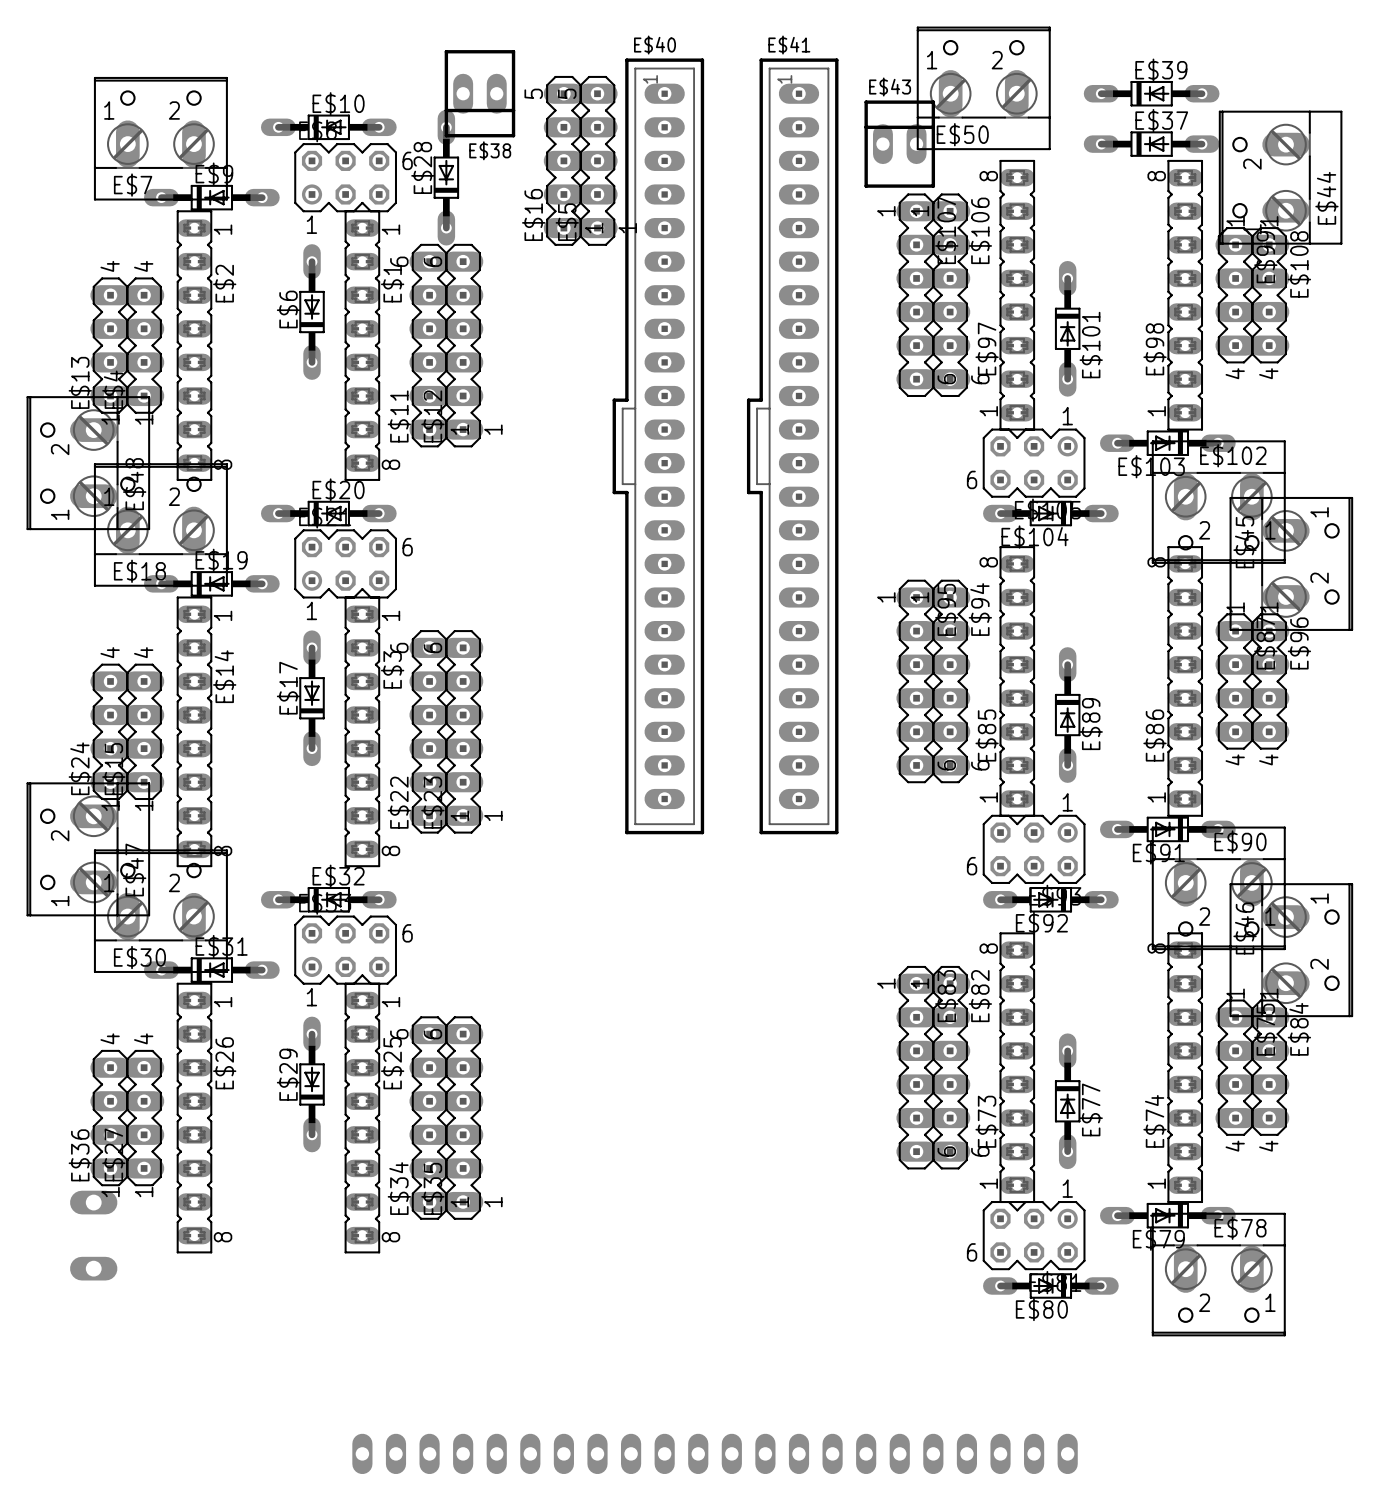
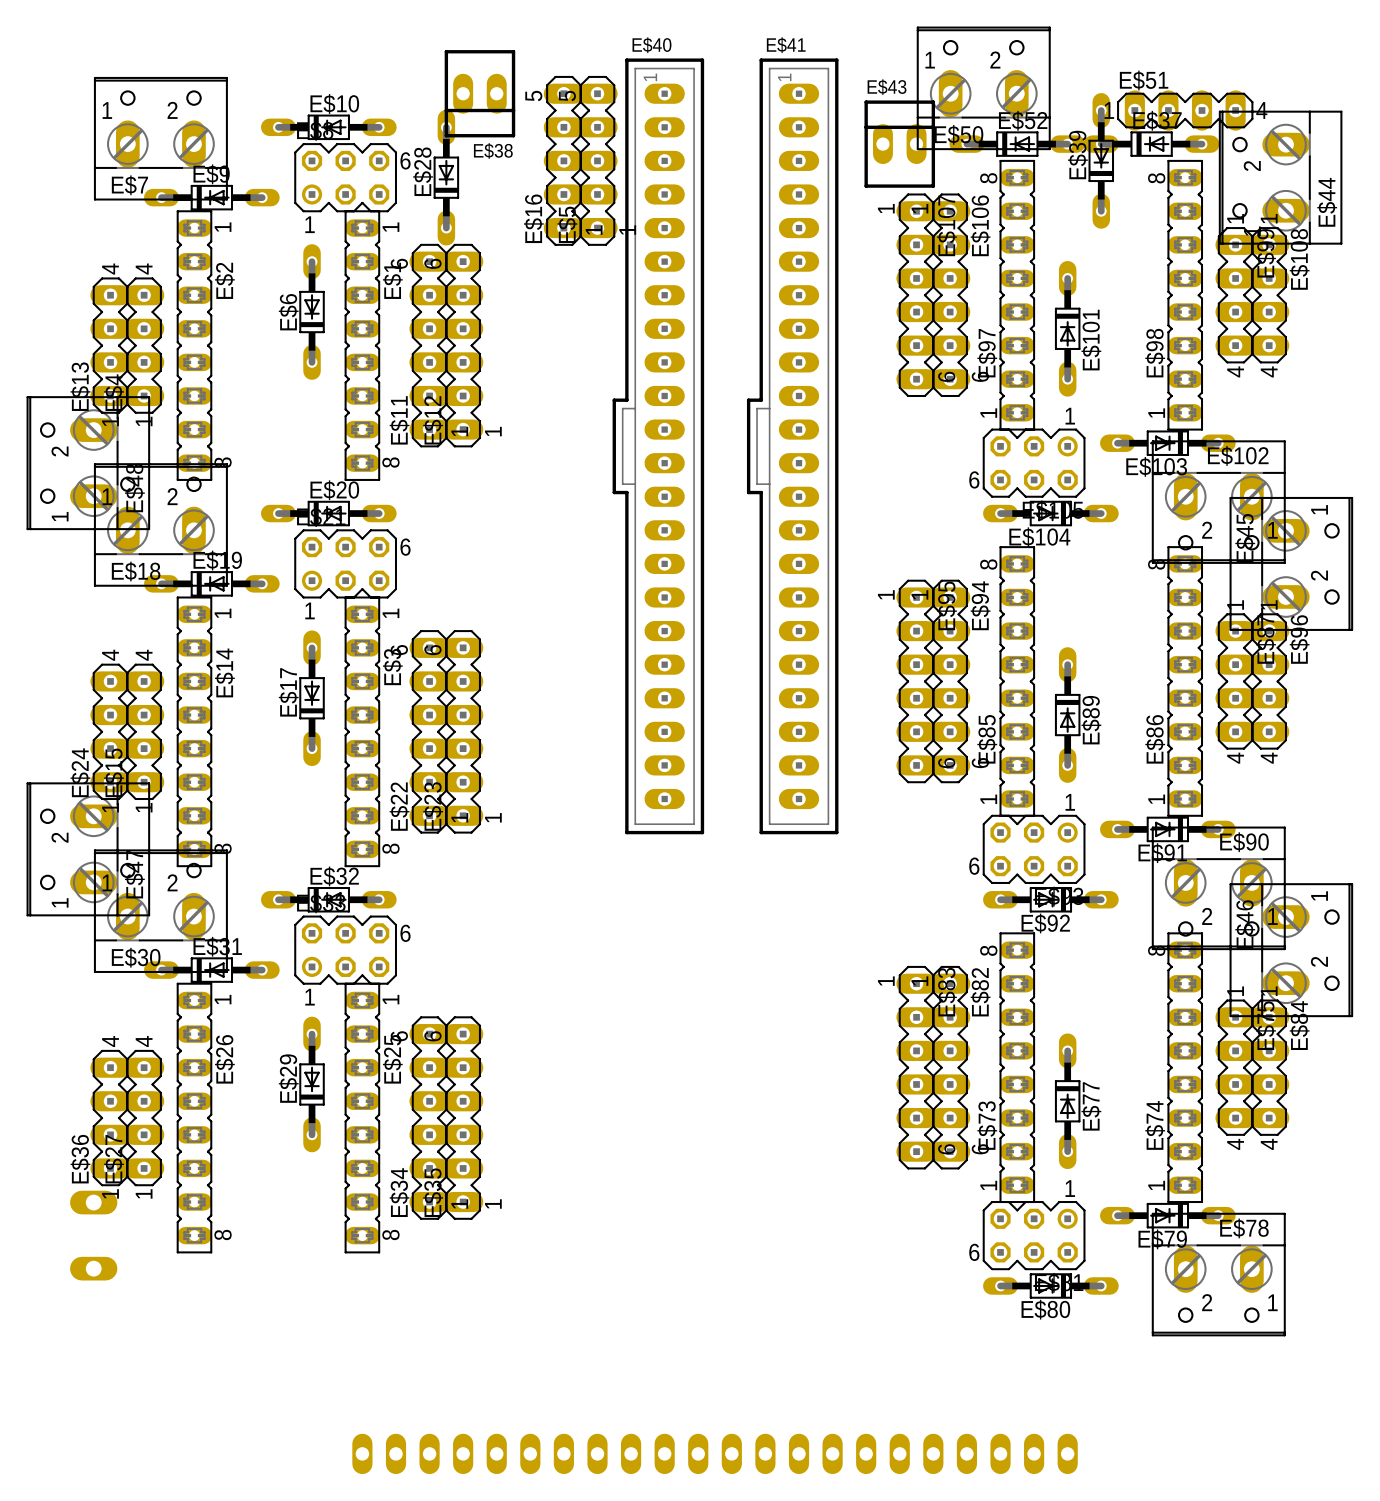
E$39 rotation: 0° (1151, 93) -> 90° counterclockwise (1101, 160)
E$39 position: (1151, 93) -> (1101, 160)
E$51: none -> (1185, 110)
E$52: none -> (1017, 144)

